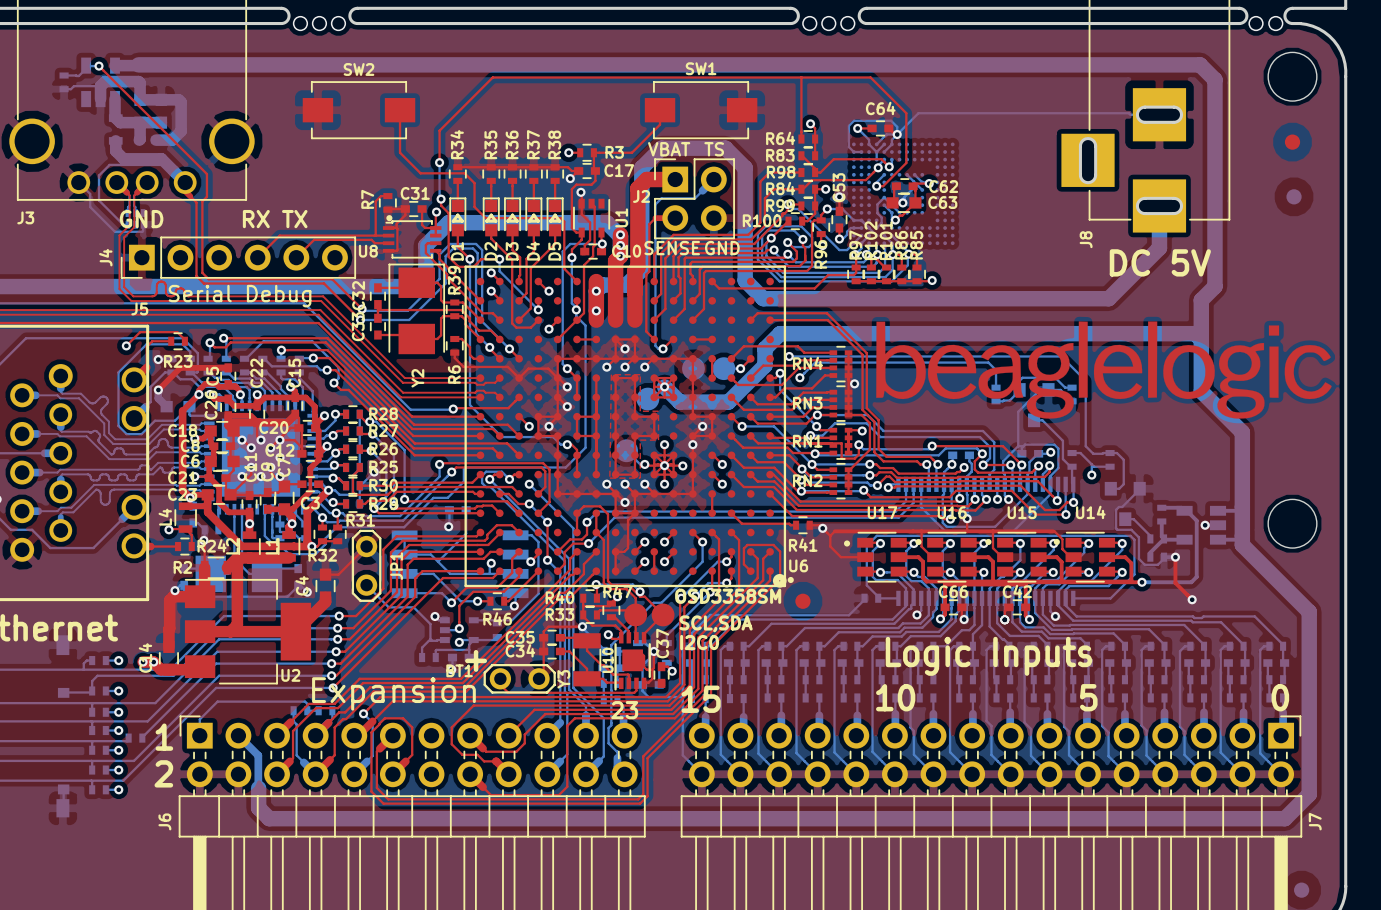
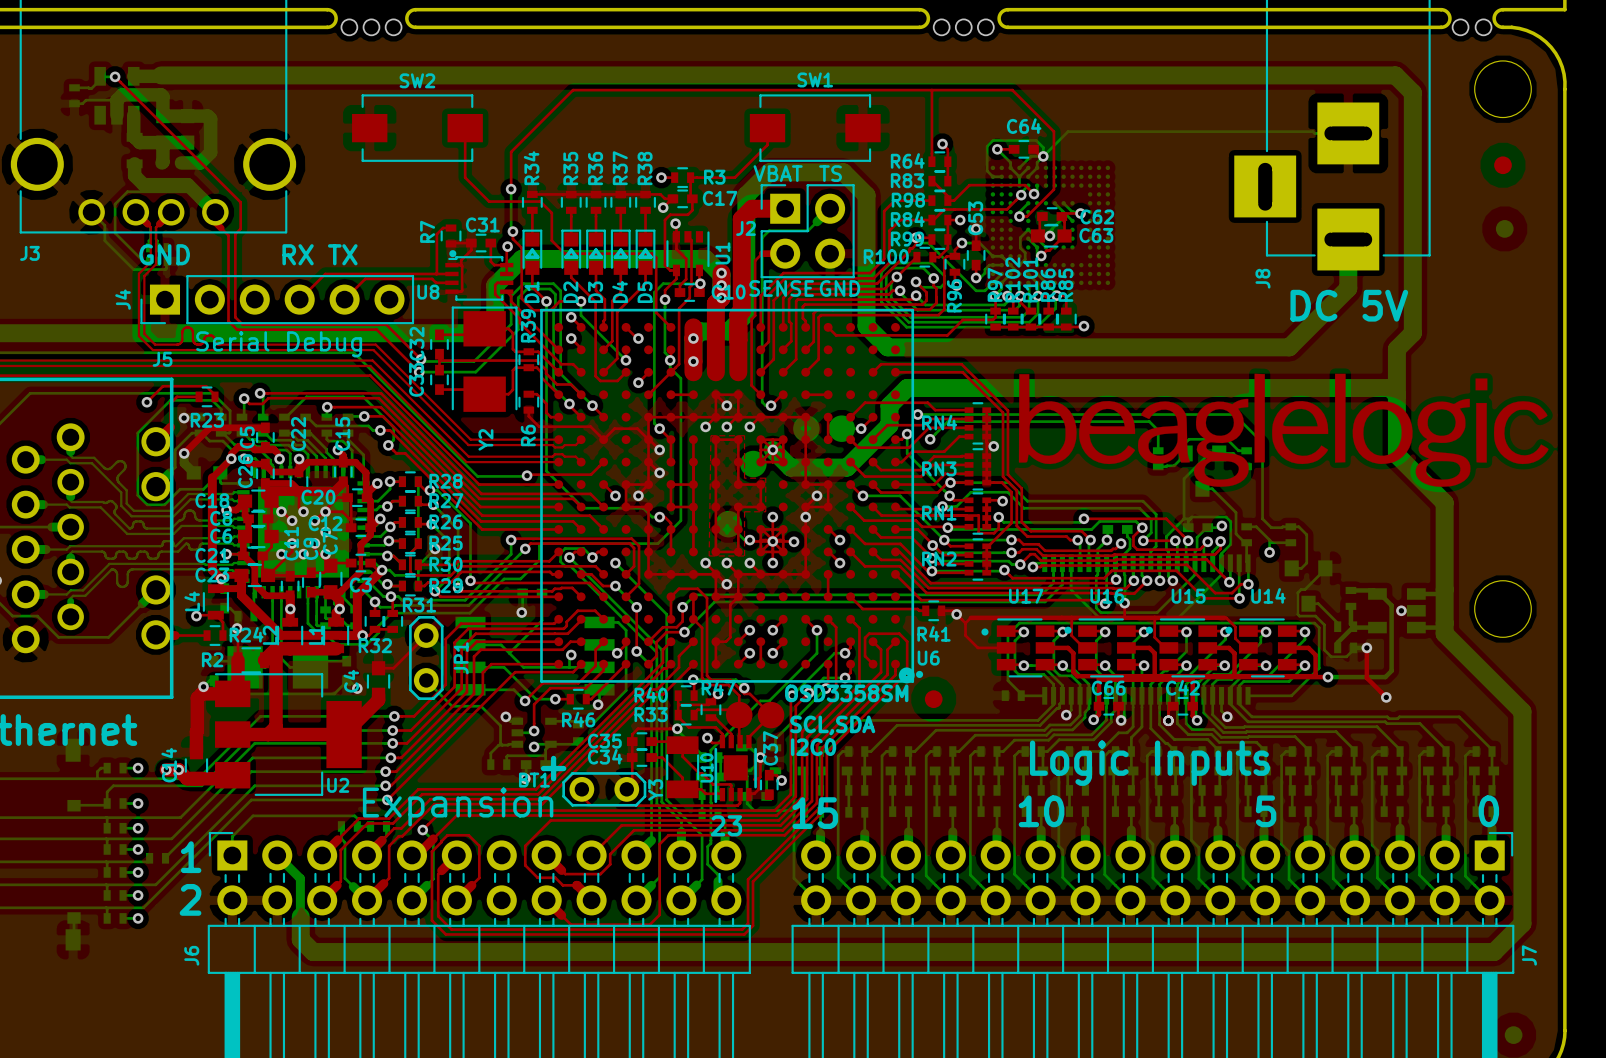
bottom track: (864, 599) (849, 615) (710, 614) (691, 633) (691, 646) -> none
top track: (624, 652) (641, 652) (644, 656) (644, 667) (649, 669) -> none

